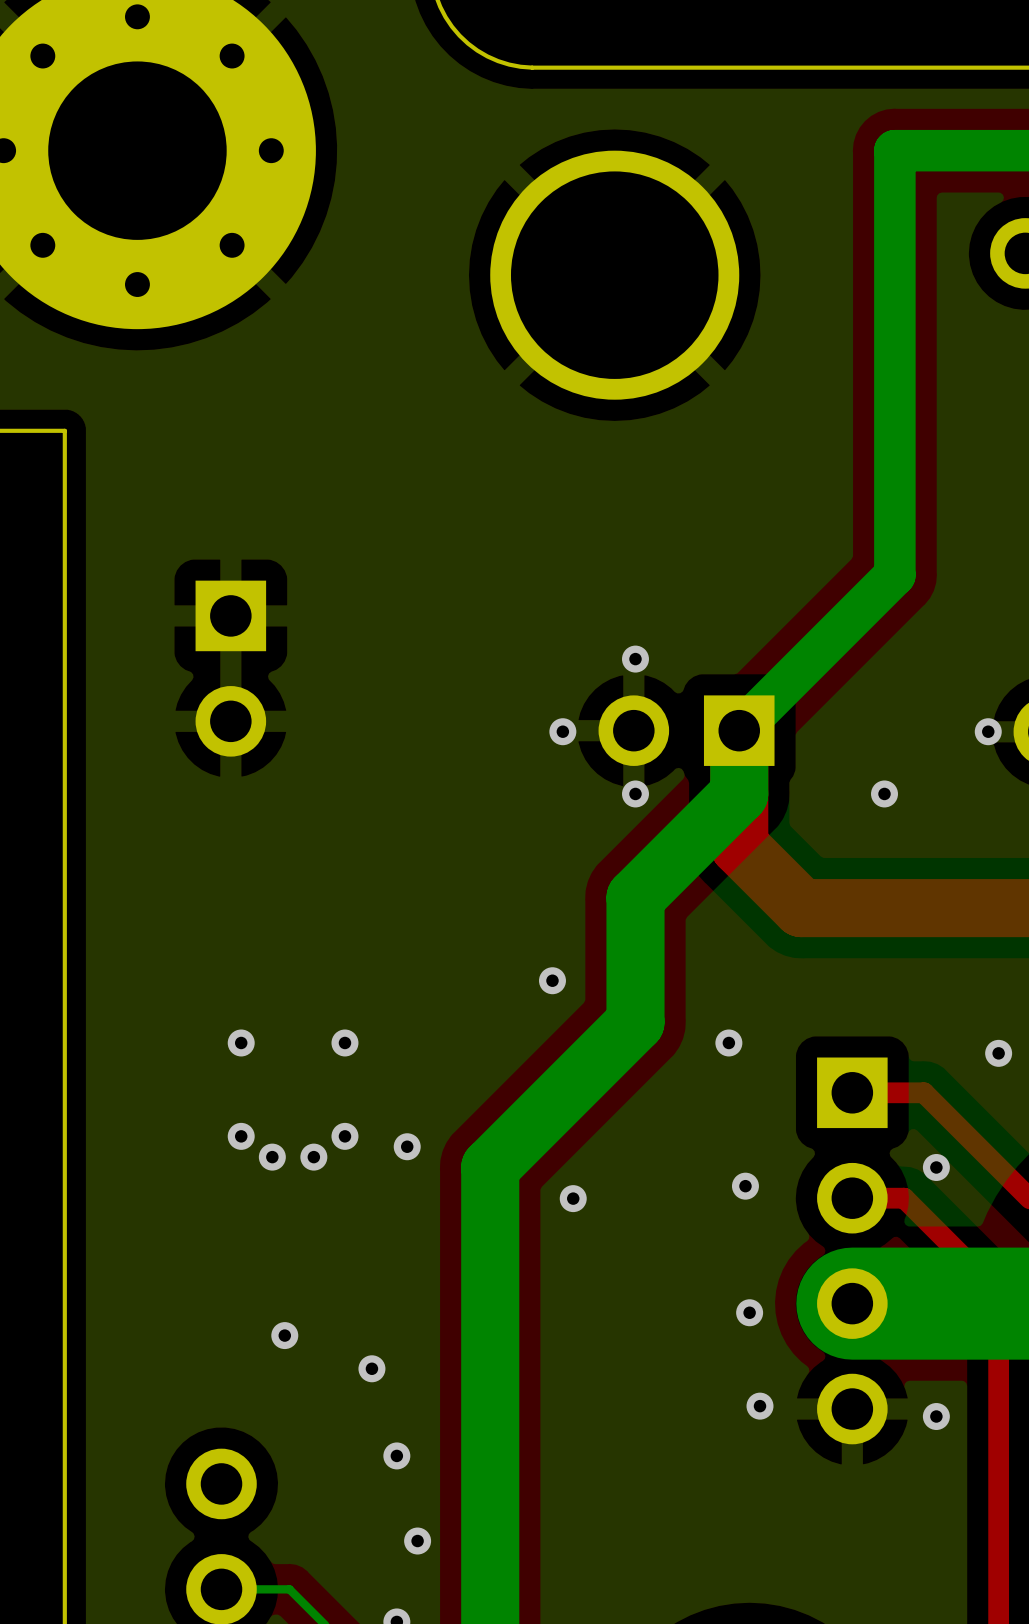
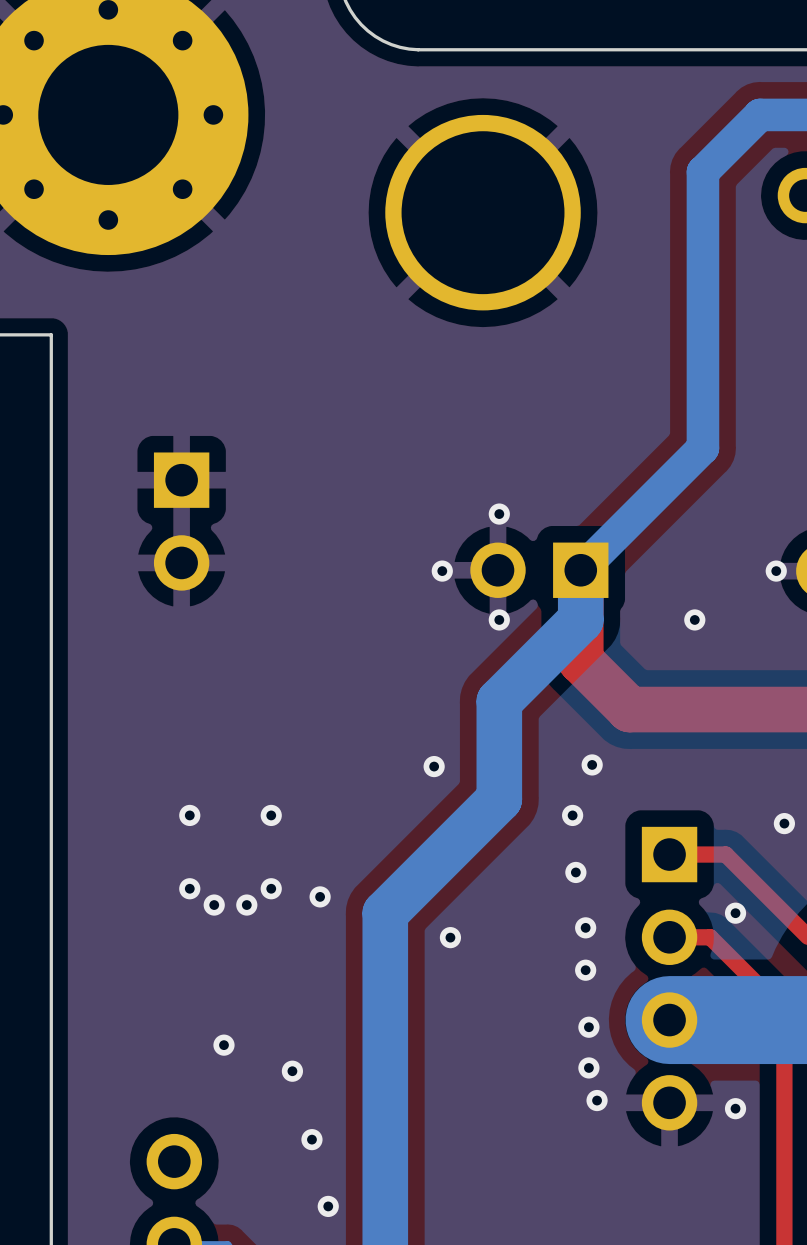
bottom track: (967, 150) (894, 150) (894, 223) -> (759, 114) (702, 171)
via: none -> (592, 764)
via: none -> (575, 872)
via: none -> (585, 970)
via: none -> (588, 1067)

